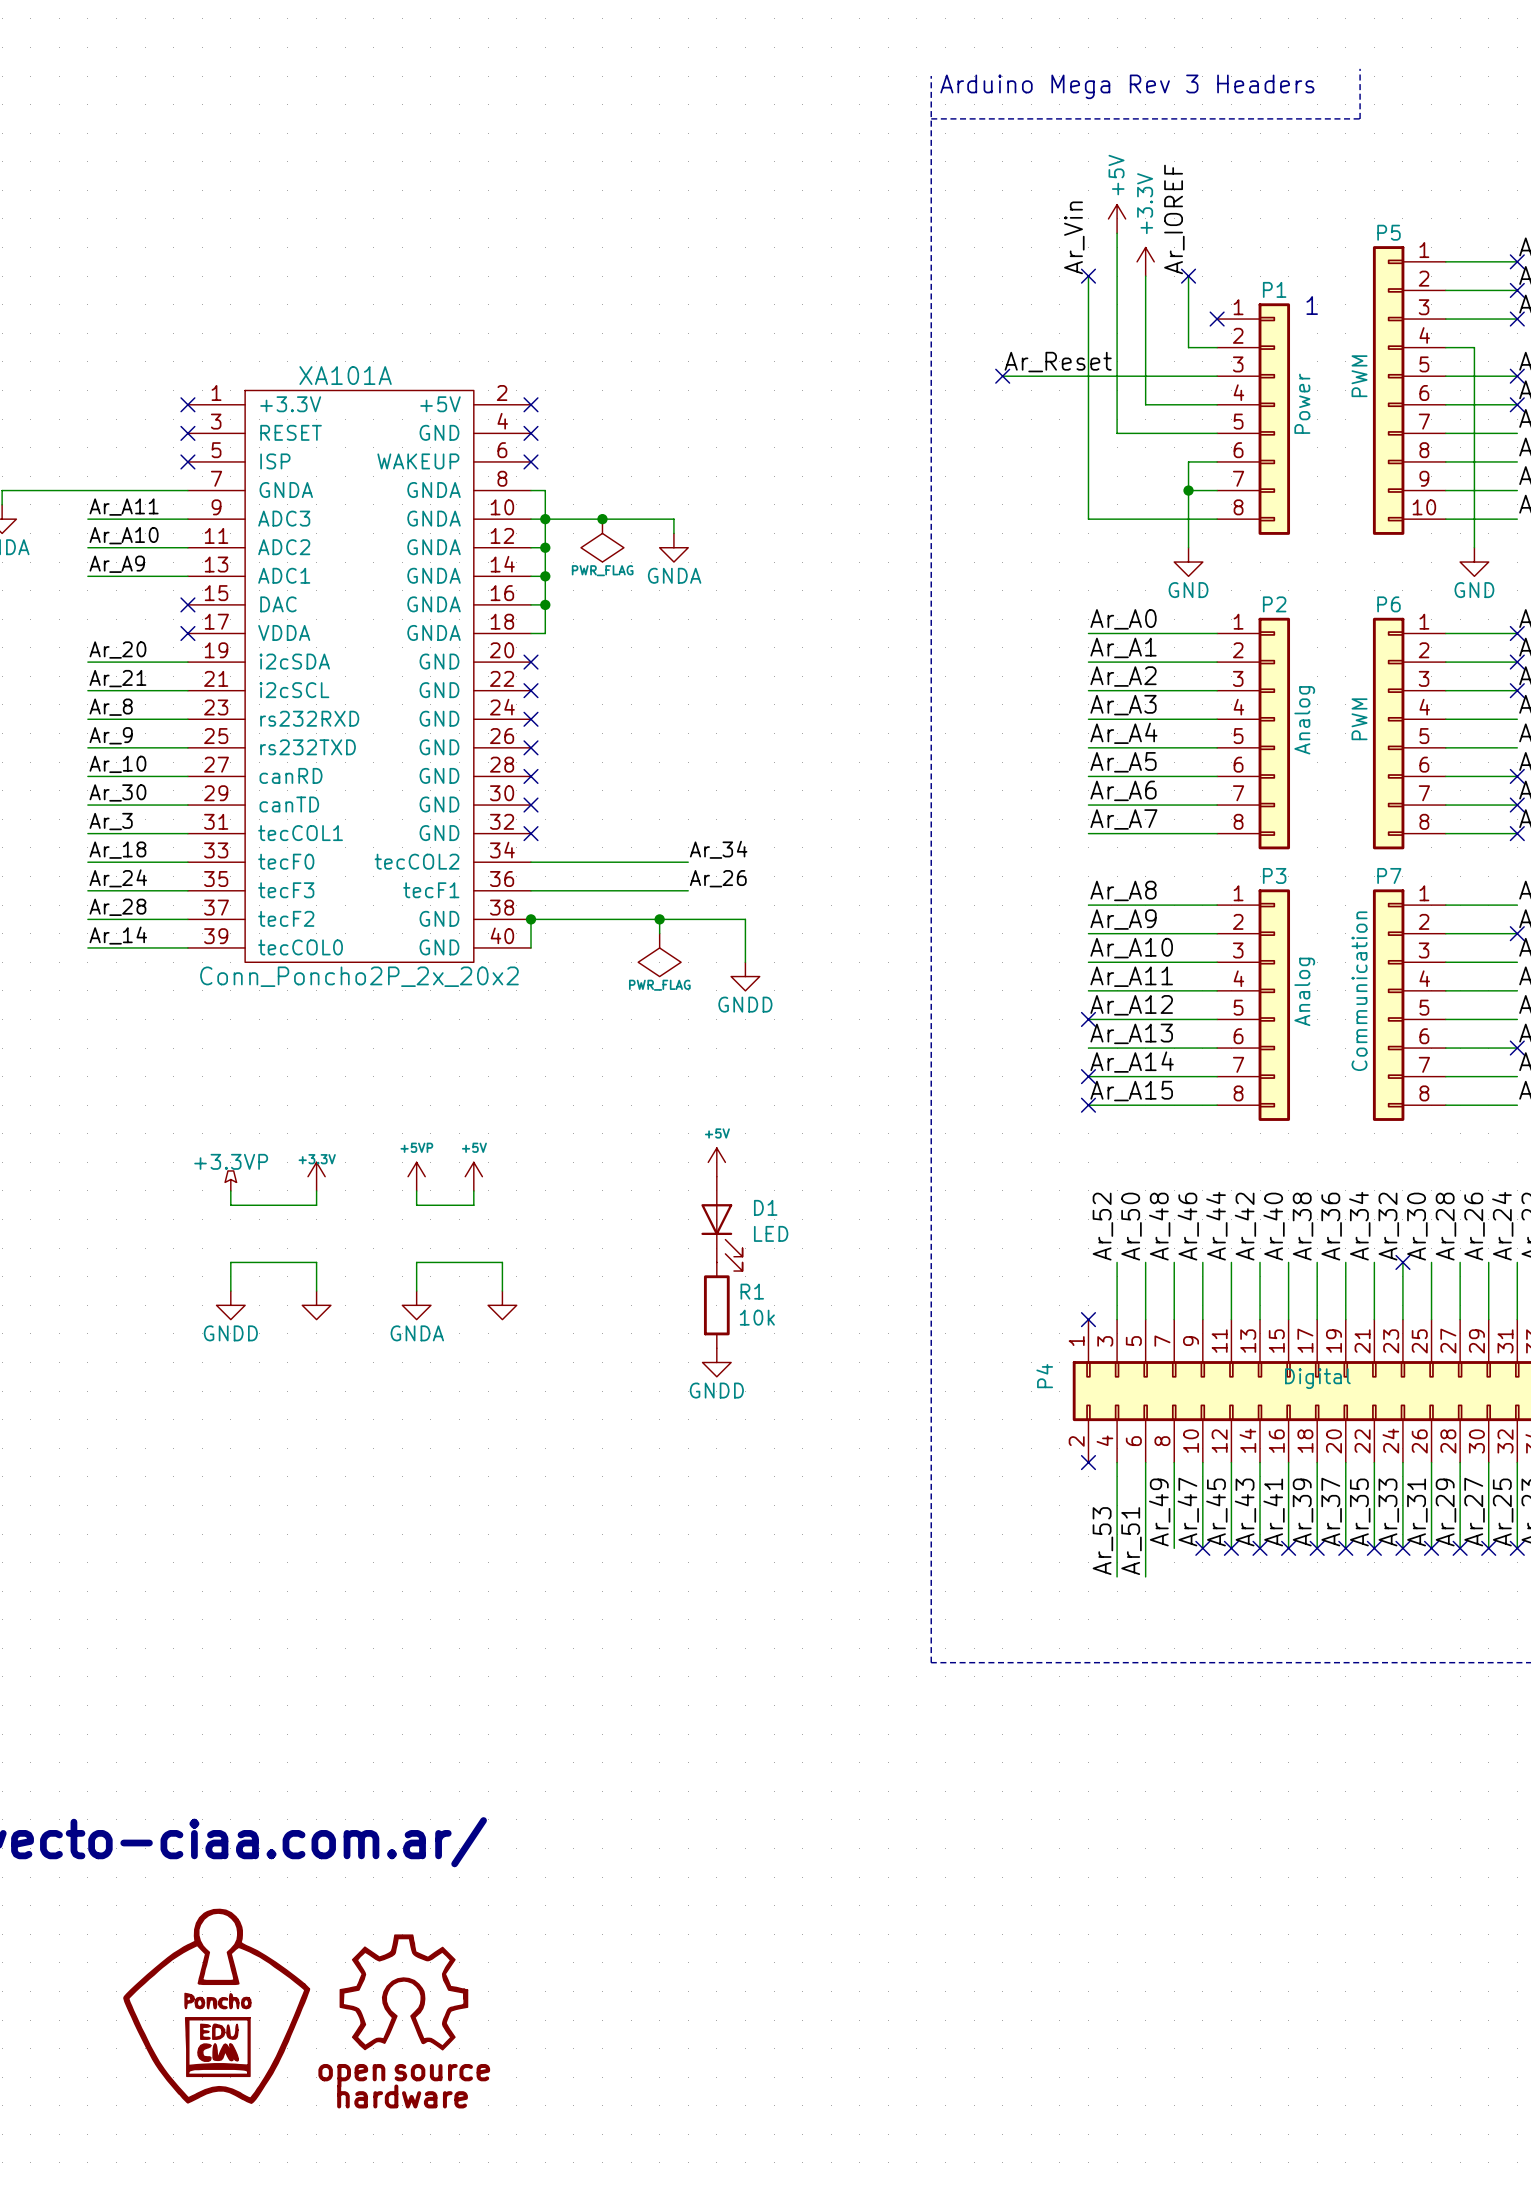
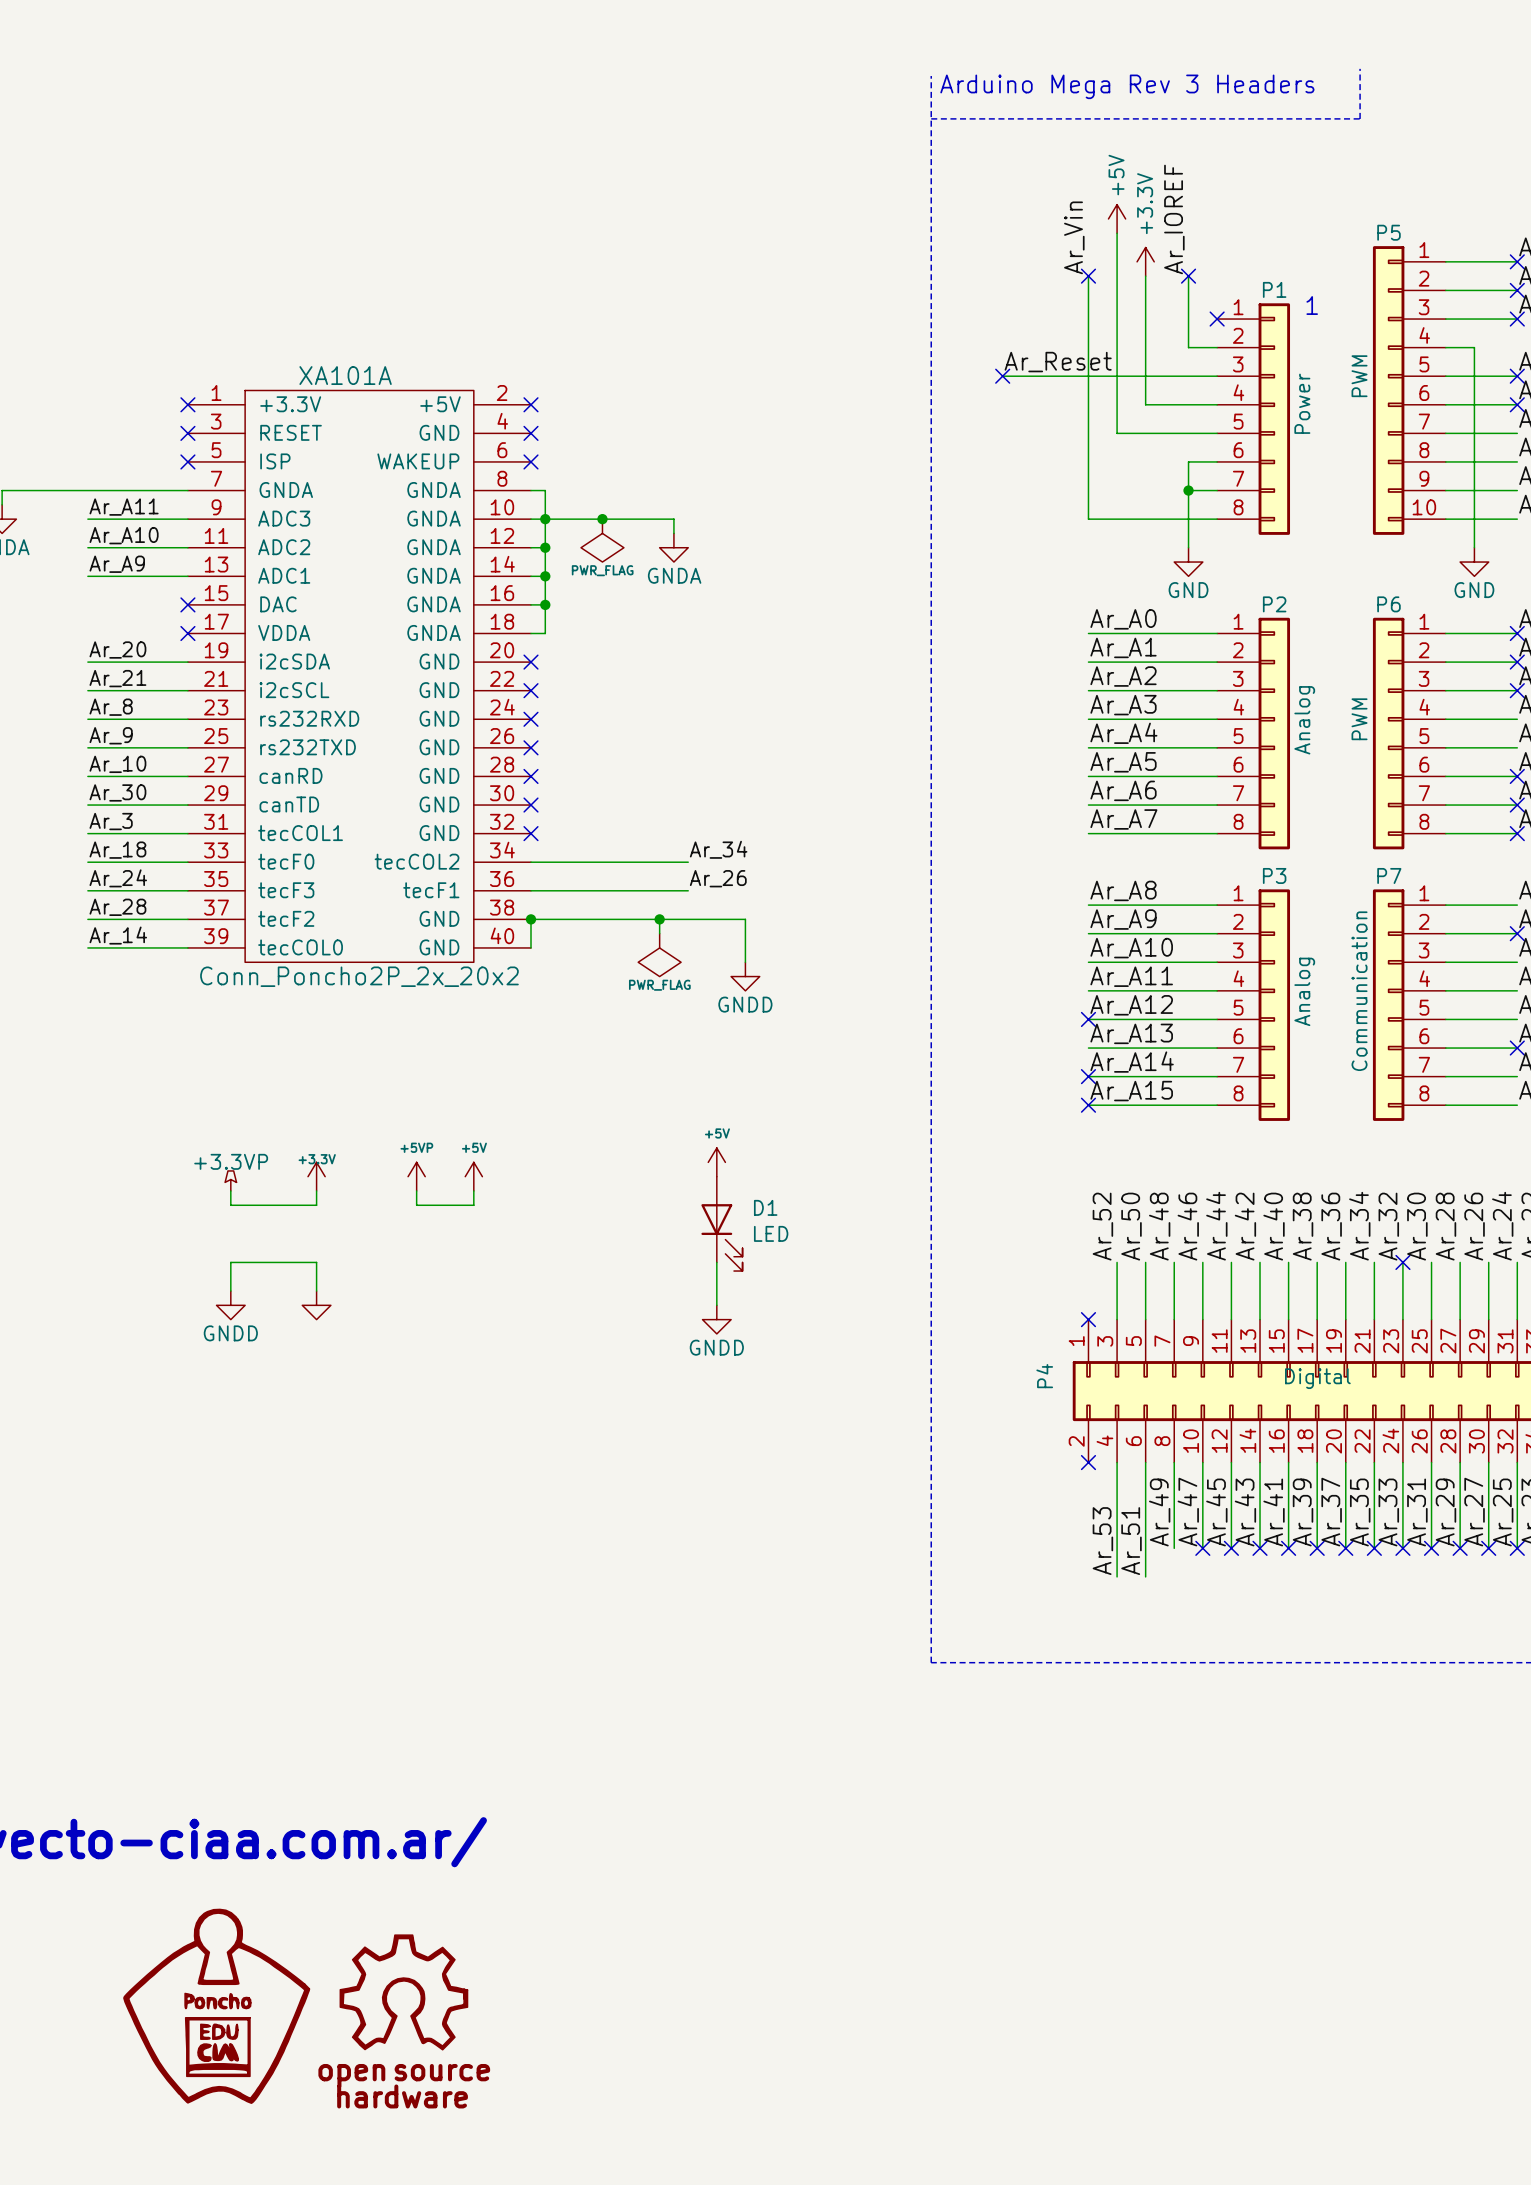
wire: none -> (716, 1262) (716, 1305)
wire: (416, 1291) (416, 1262) (502, 1262) (502, 1291) -> none
power symbol: GNDA (416, 1305) -> none
power symbol: (502, 1305) -> none
R1: 10k (716, 1305) -> none
power symbol position: GNDD (716, 1362) -> GNDD (716, 1319)

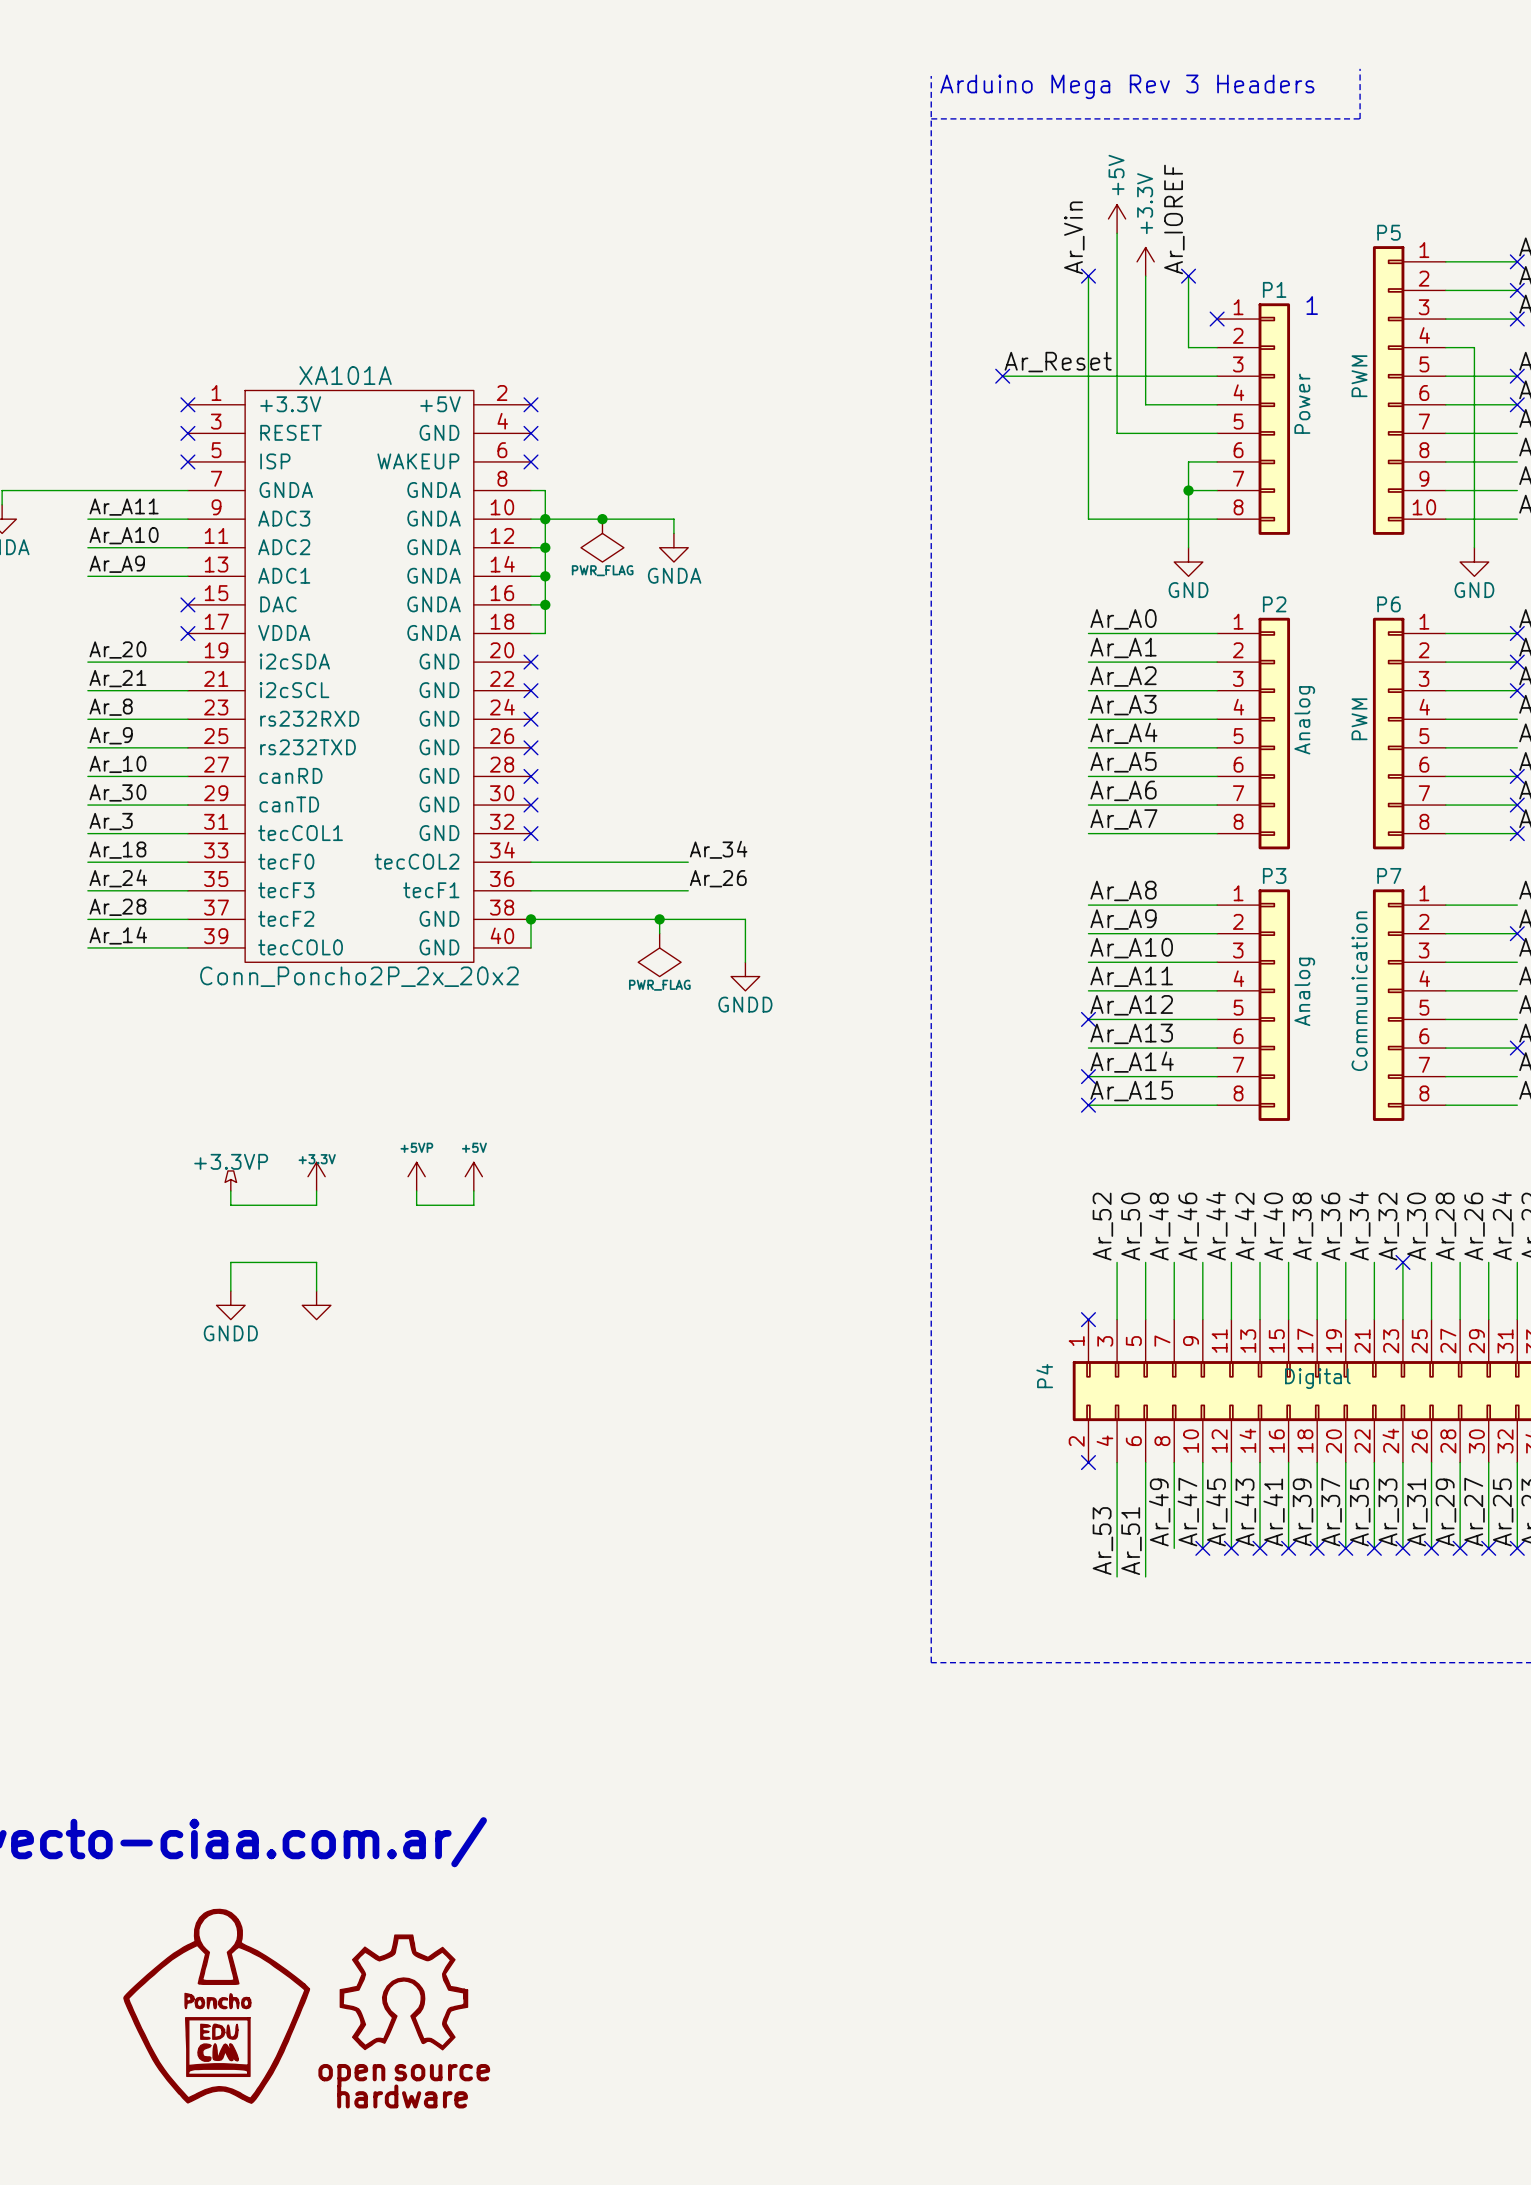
power symbol: +5V (716, 1162) -> none
D1: LED (721, 1223) -> none
wire: (716, 1262) (716, 1305) -> none
power symbol: GNDD (716, 1319) -> none

